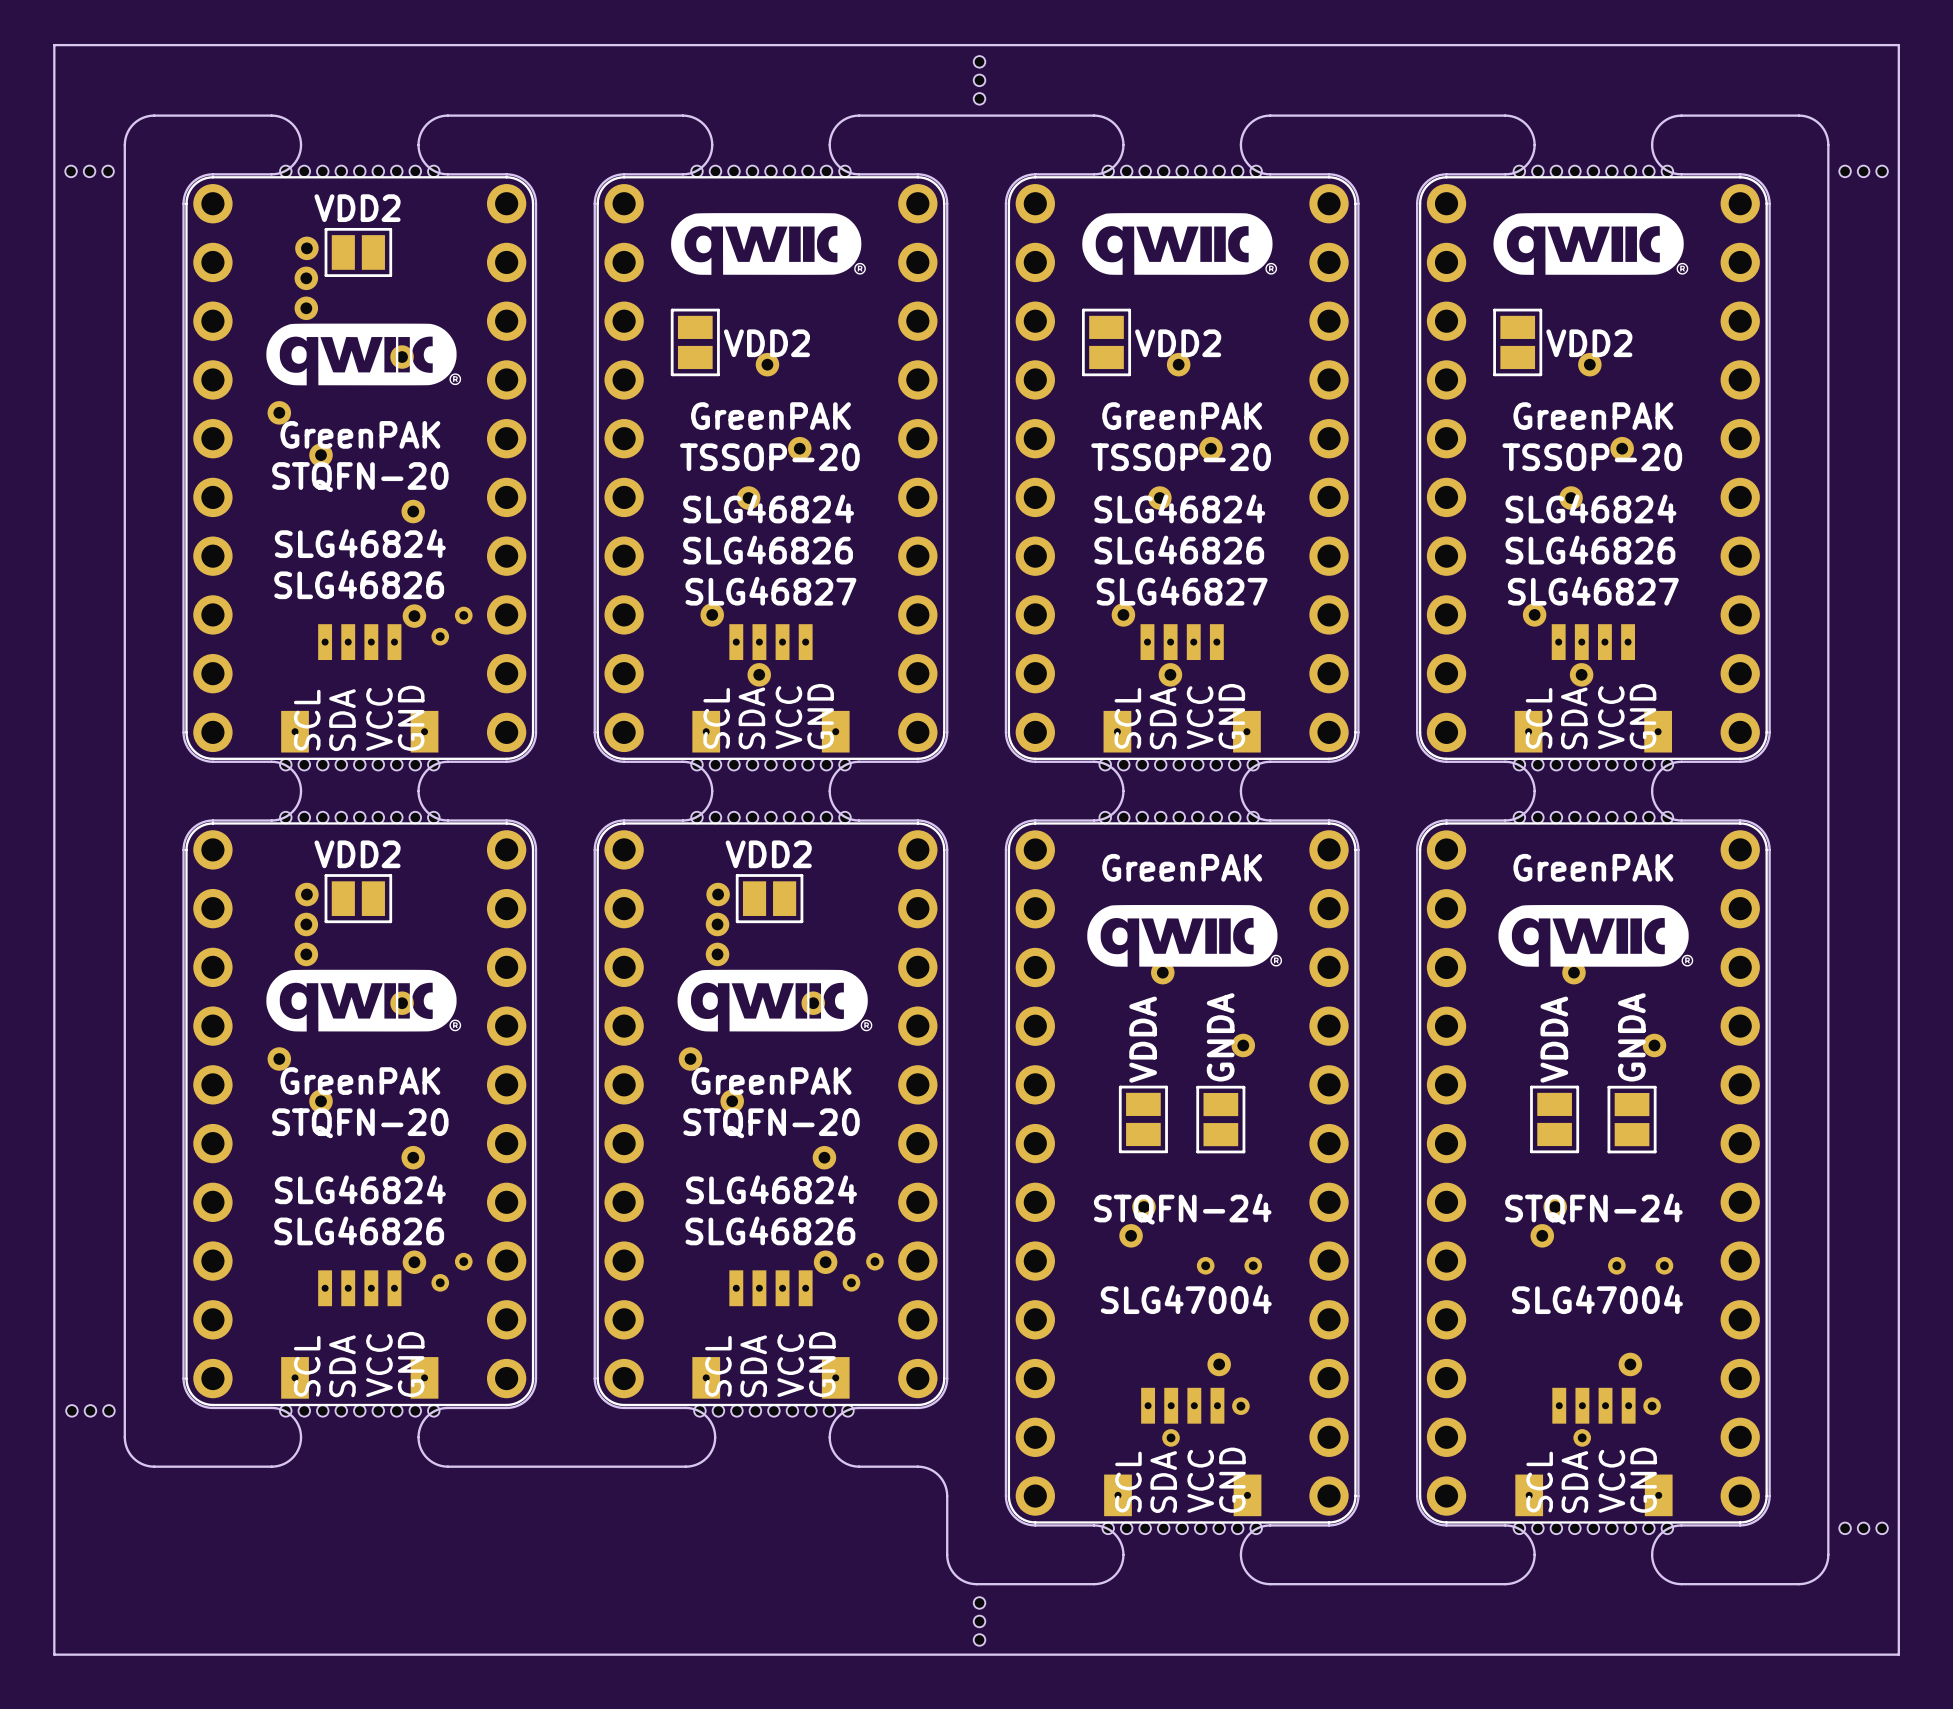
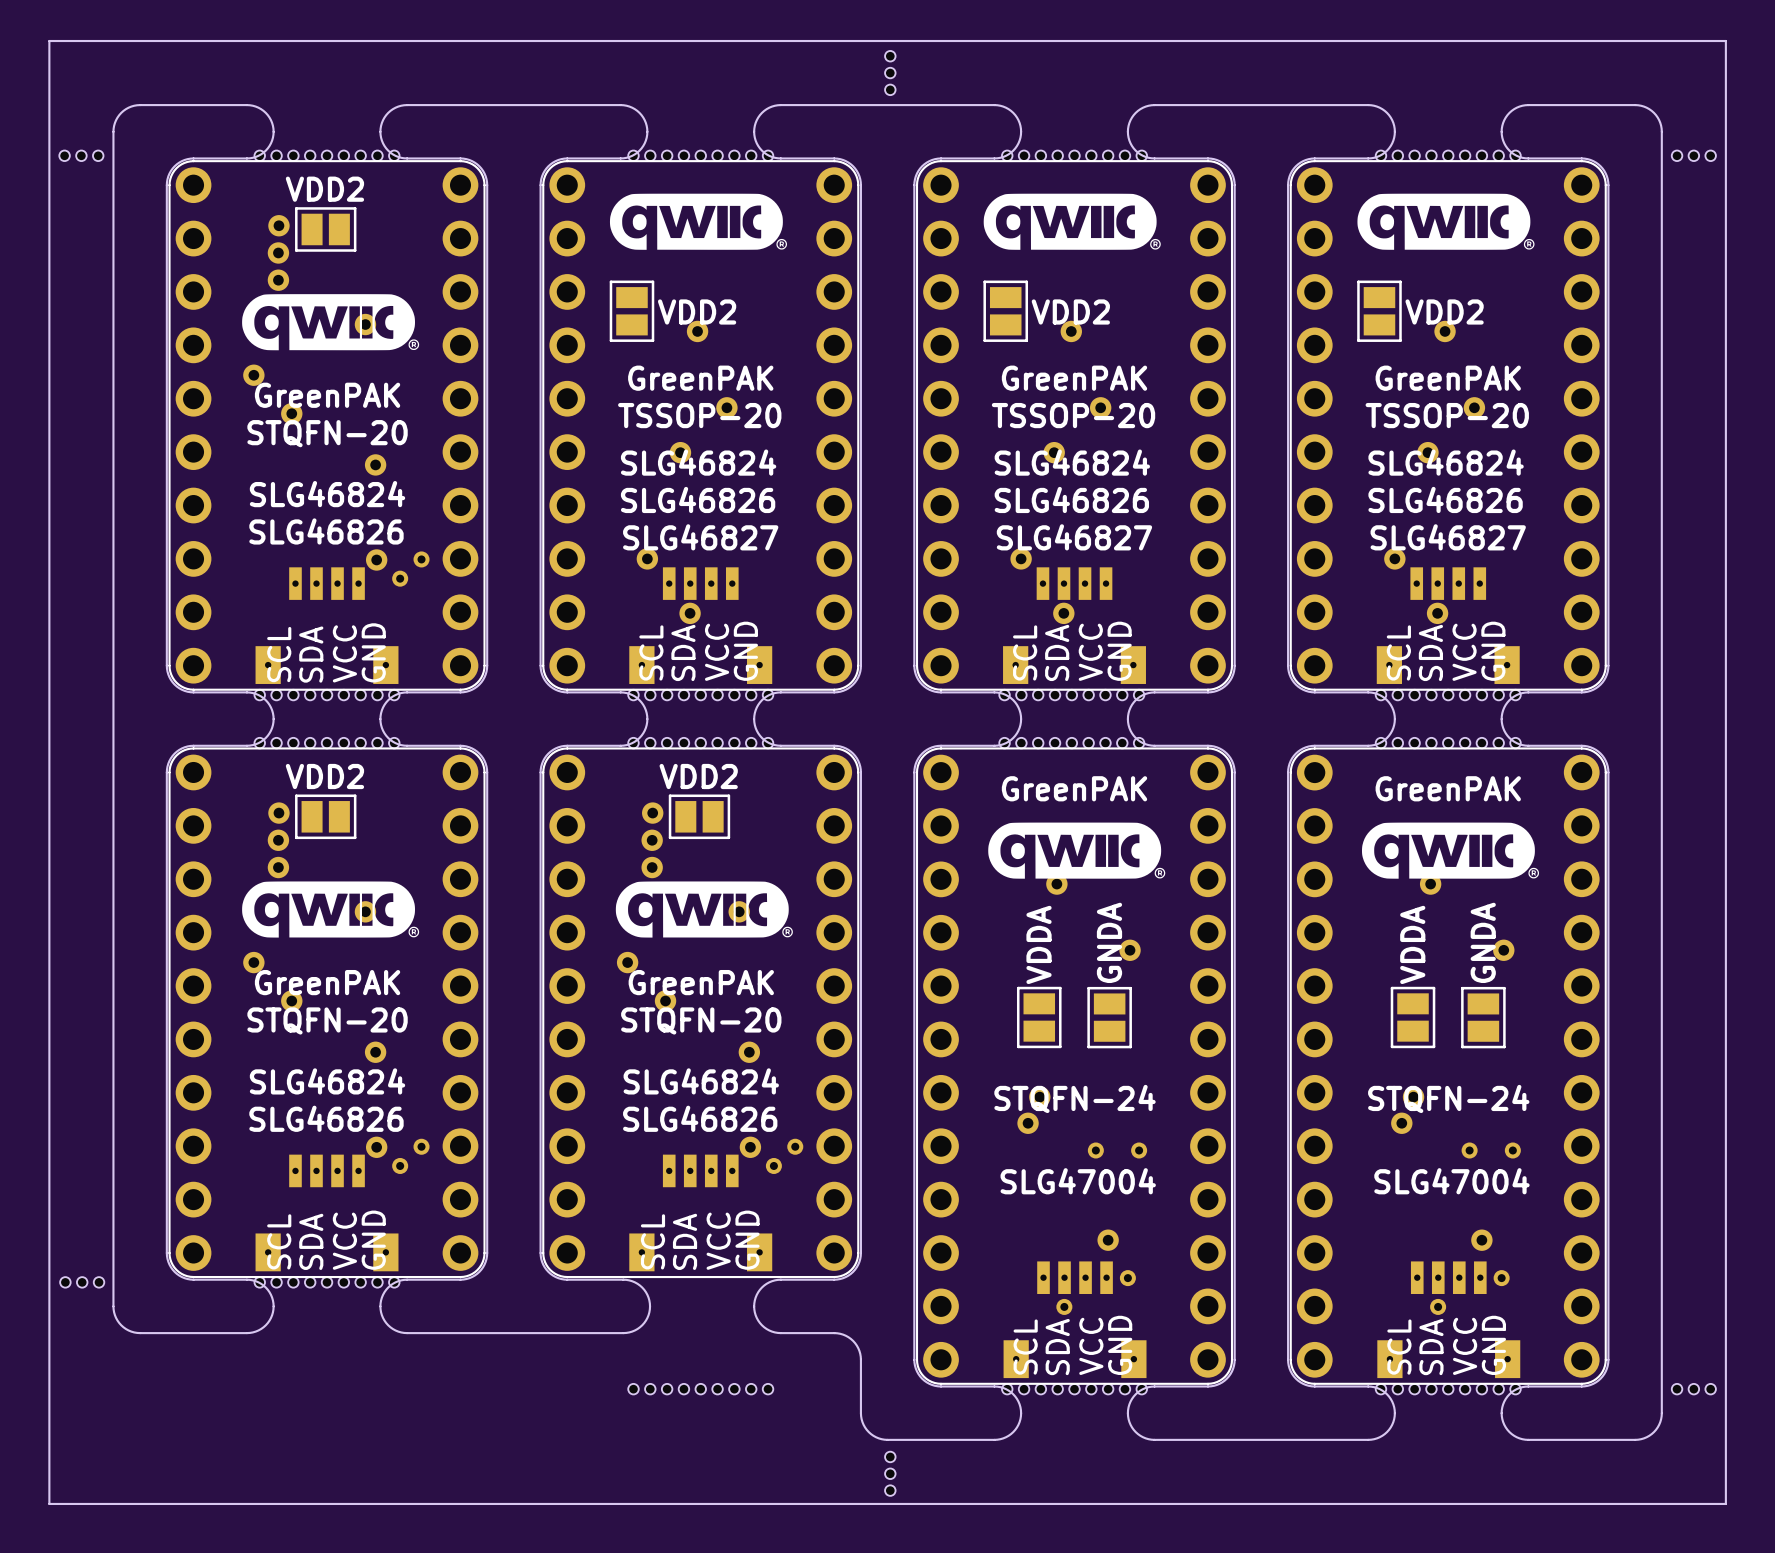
part position: (773, 1410) -> (700, 1389)

